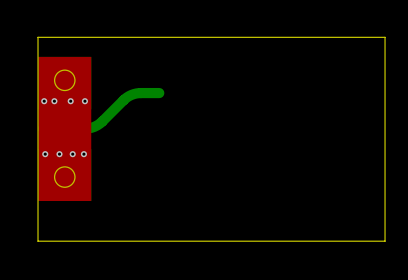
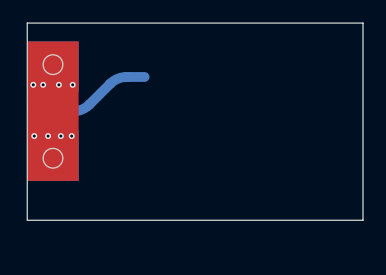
part rotation: 0° (64, 128) -> 180° (52, 111)

